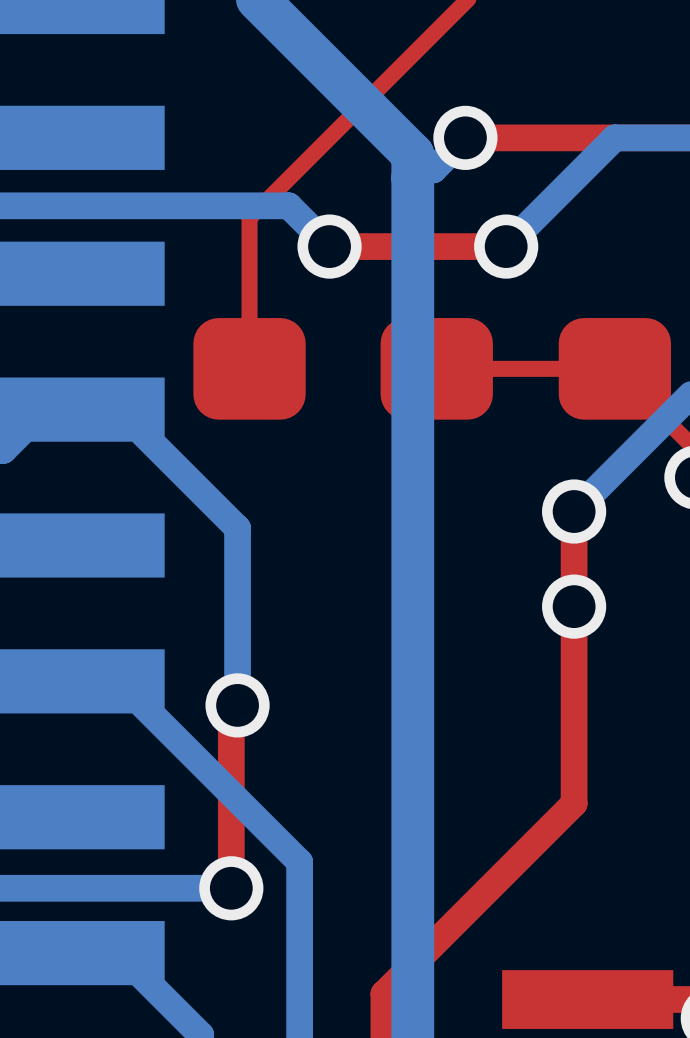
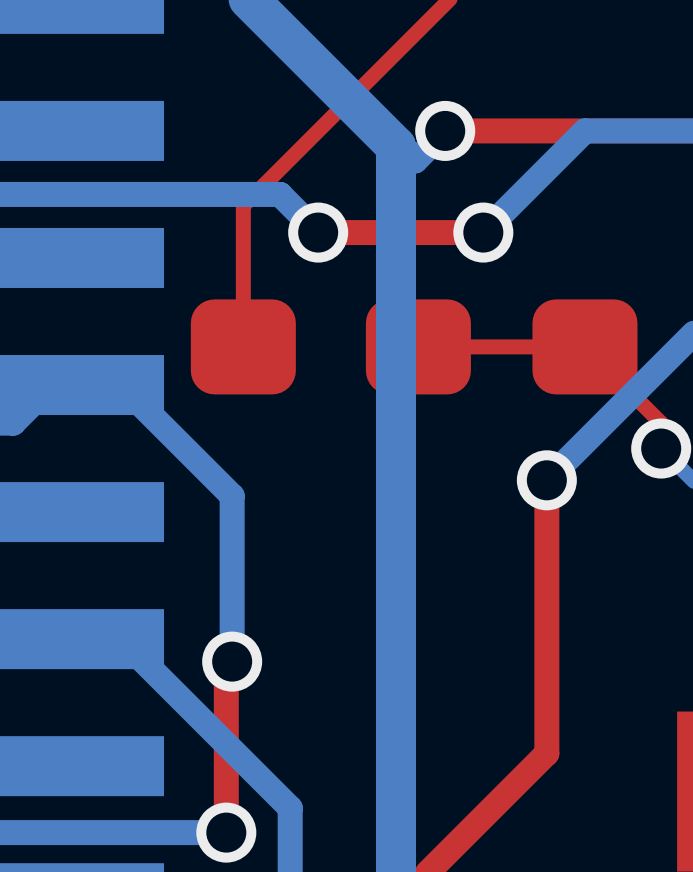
via: (574, 606) -> none

